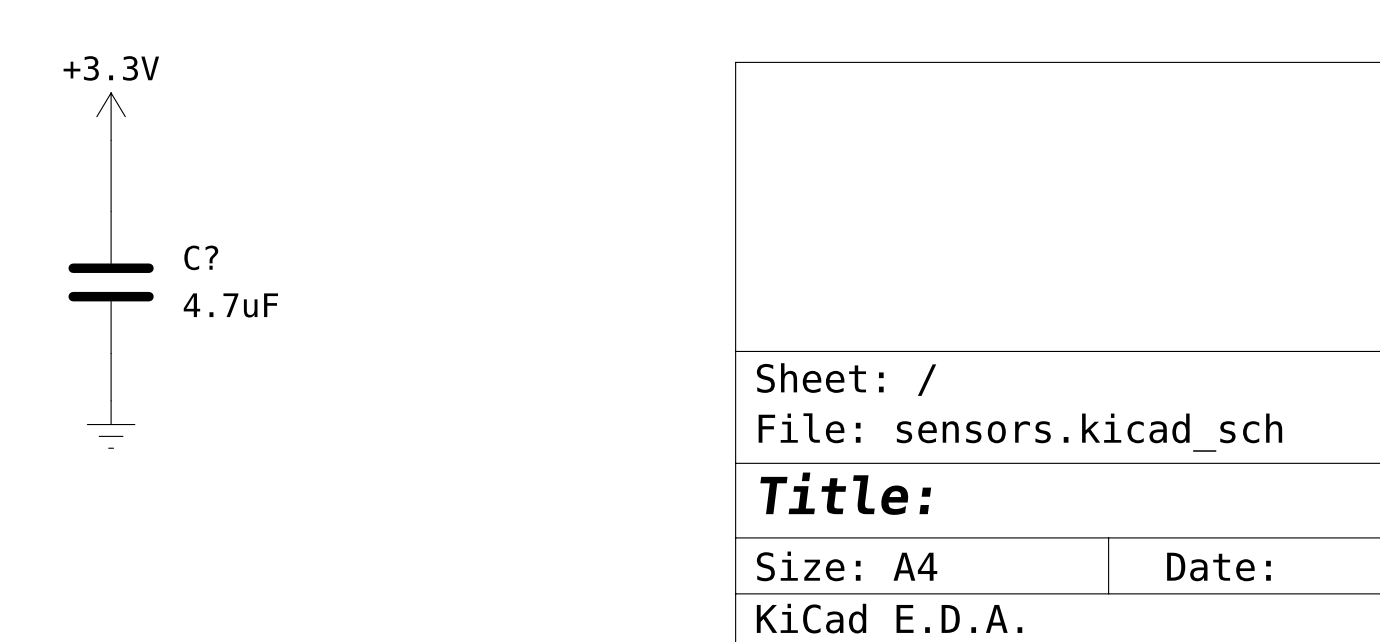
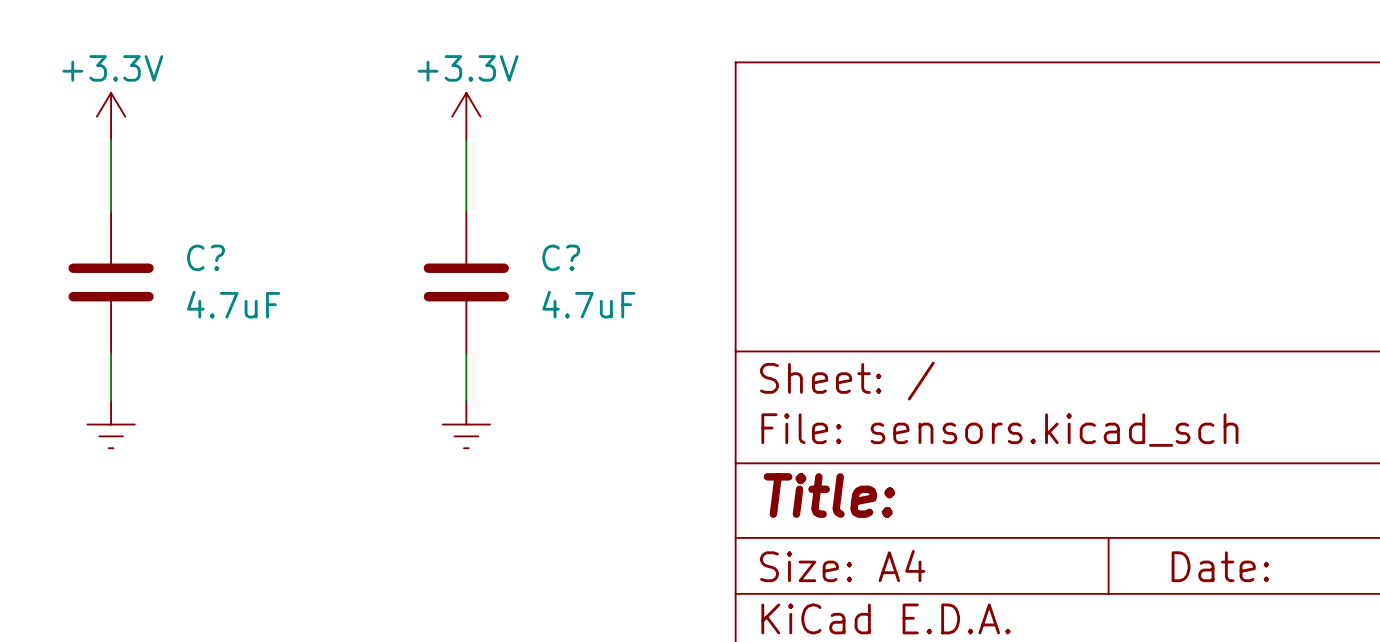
power symbol: none -> +3.3V (466, 116)
wire: none -> (466, 140) (466, 211)
C?: none -> 4.7uF (466, 282)
wire: none -> (466, 353) (466, 400)
power symbol: none -> (466, 424)

